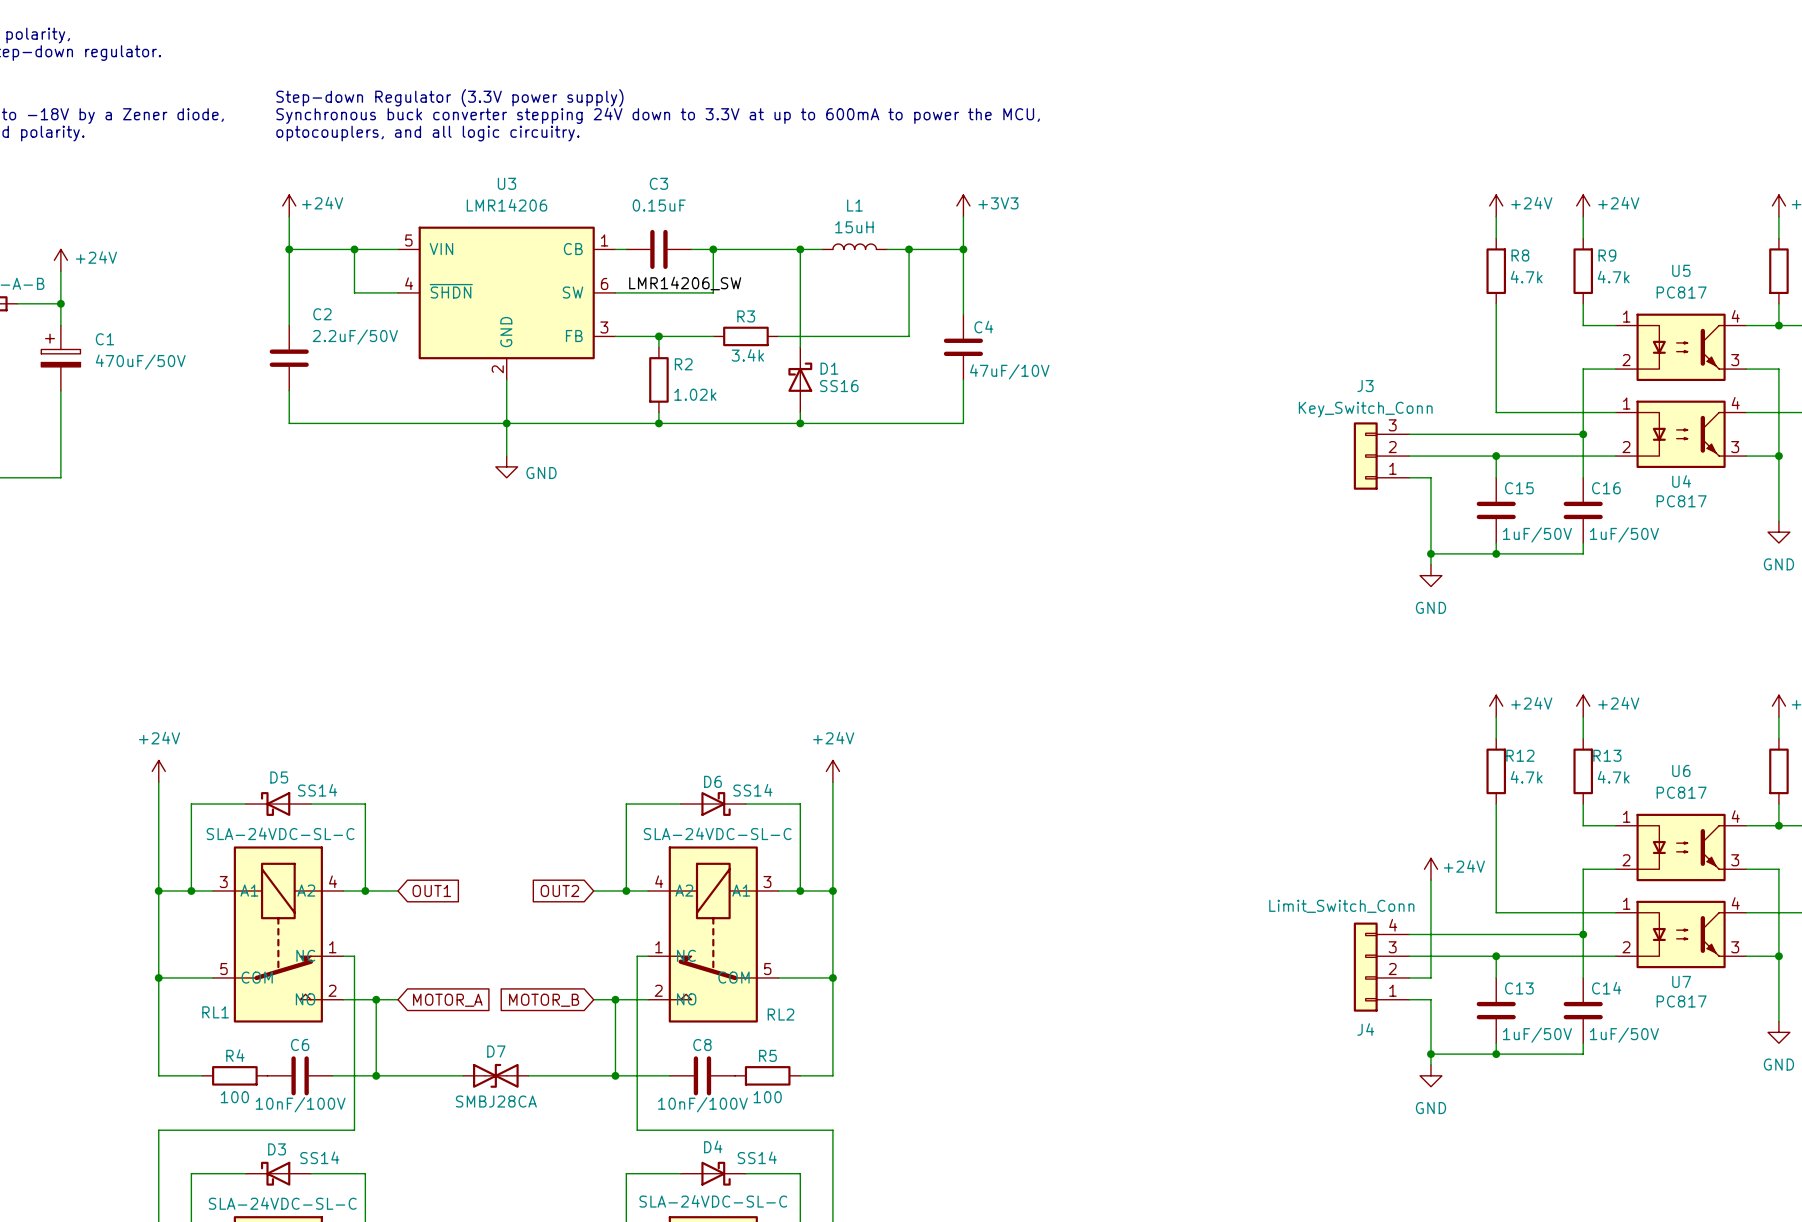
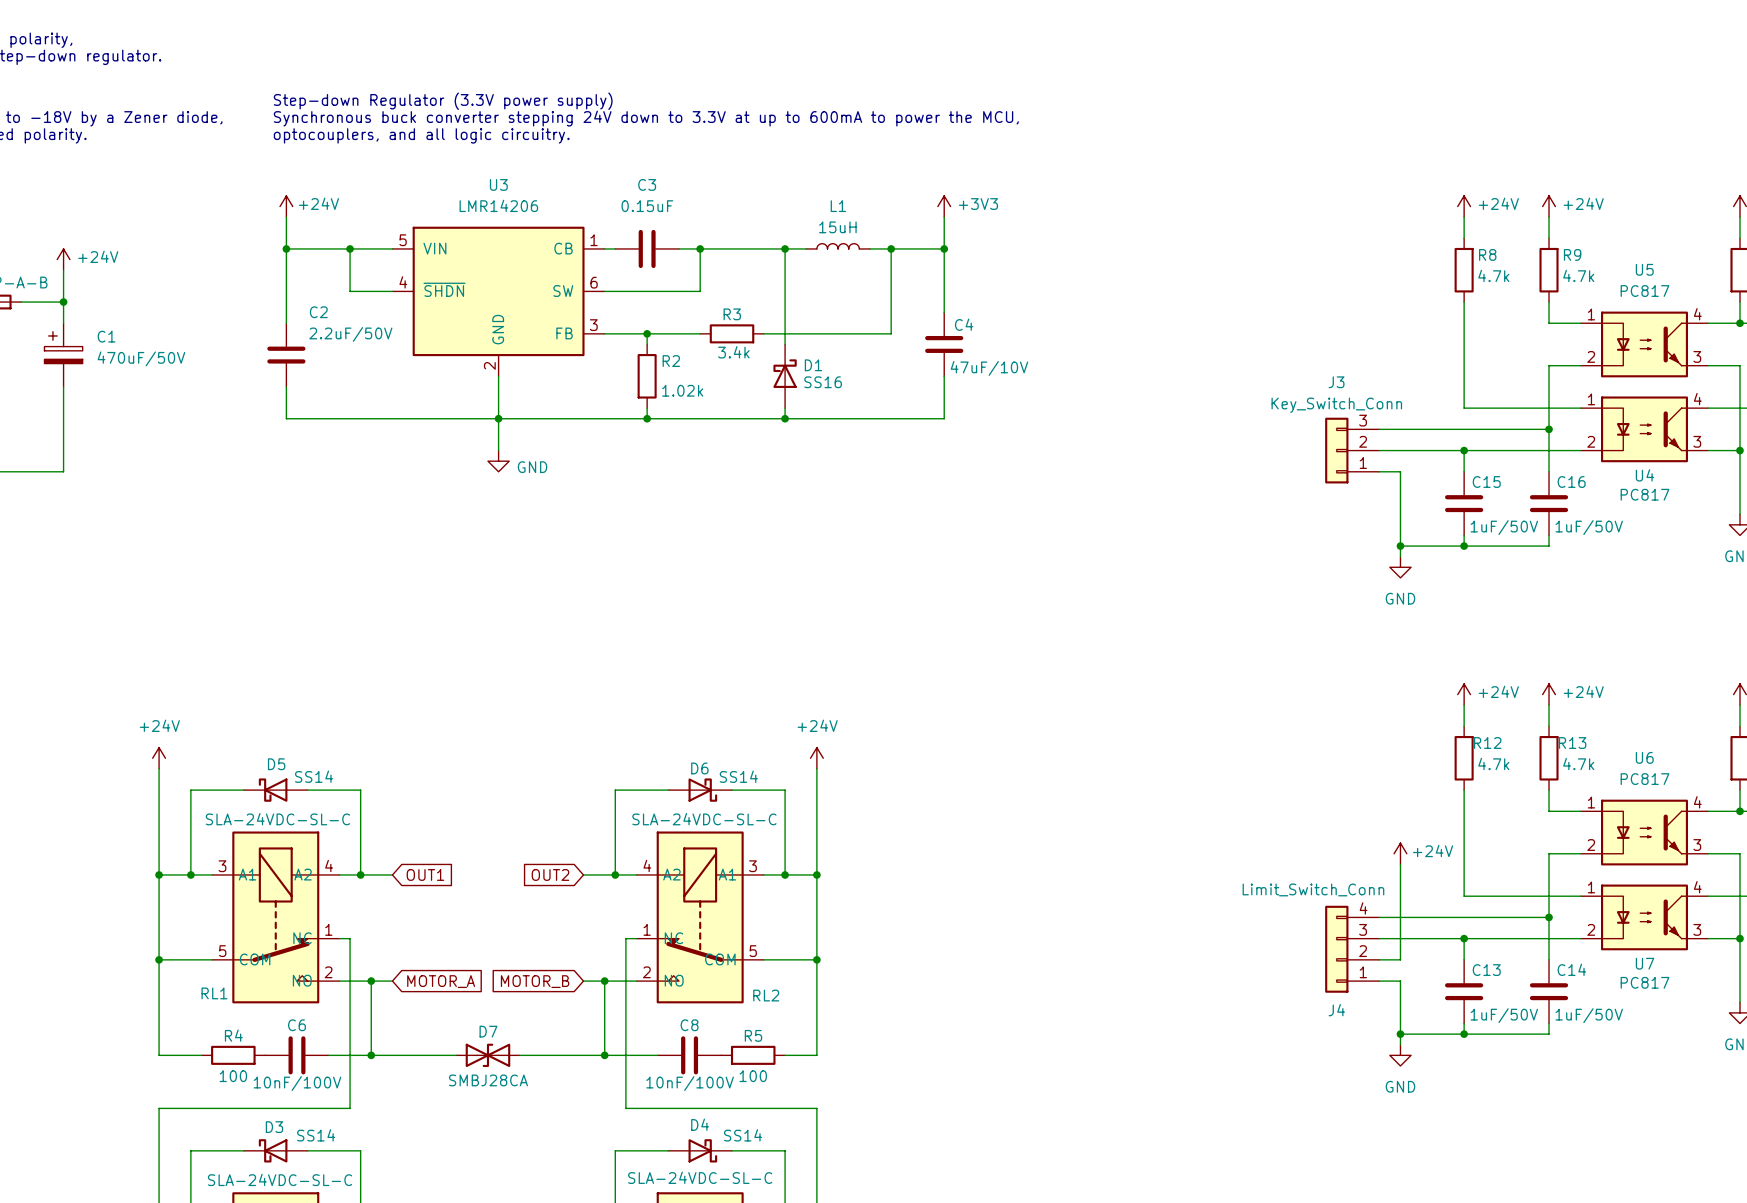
label: LMR14206_SW (685, 283) -> none

